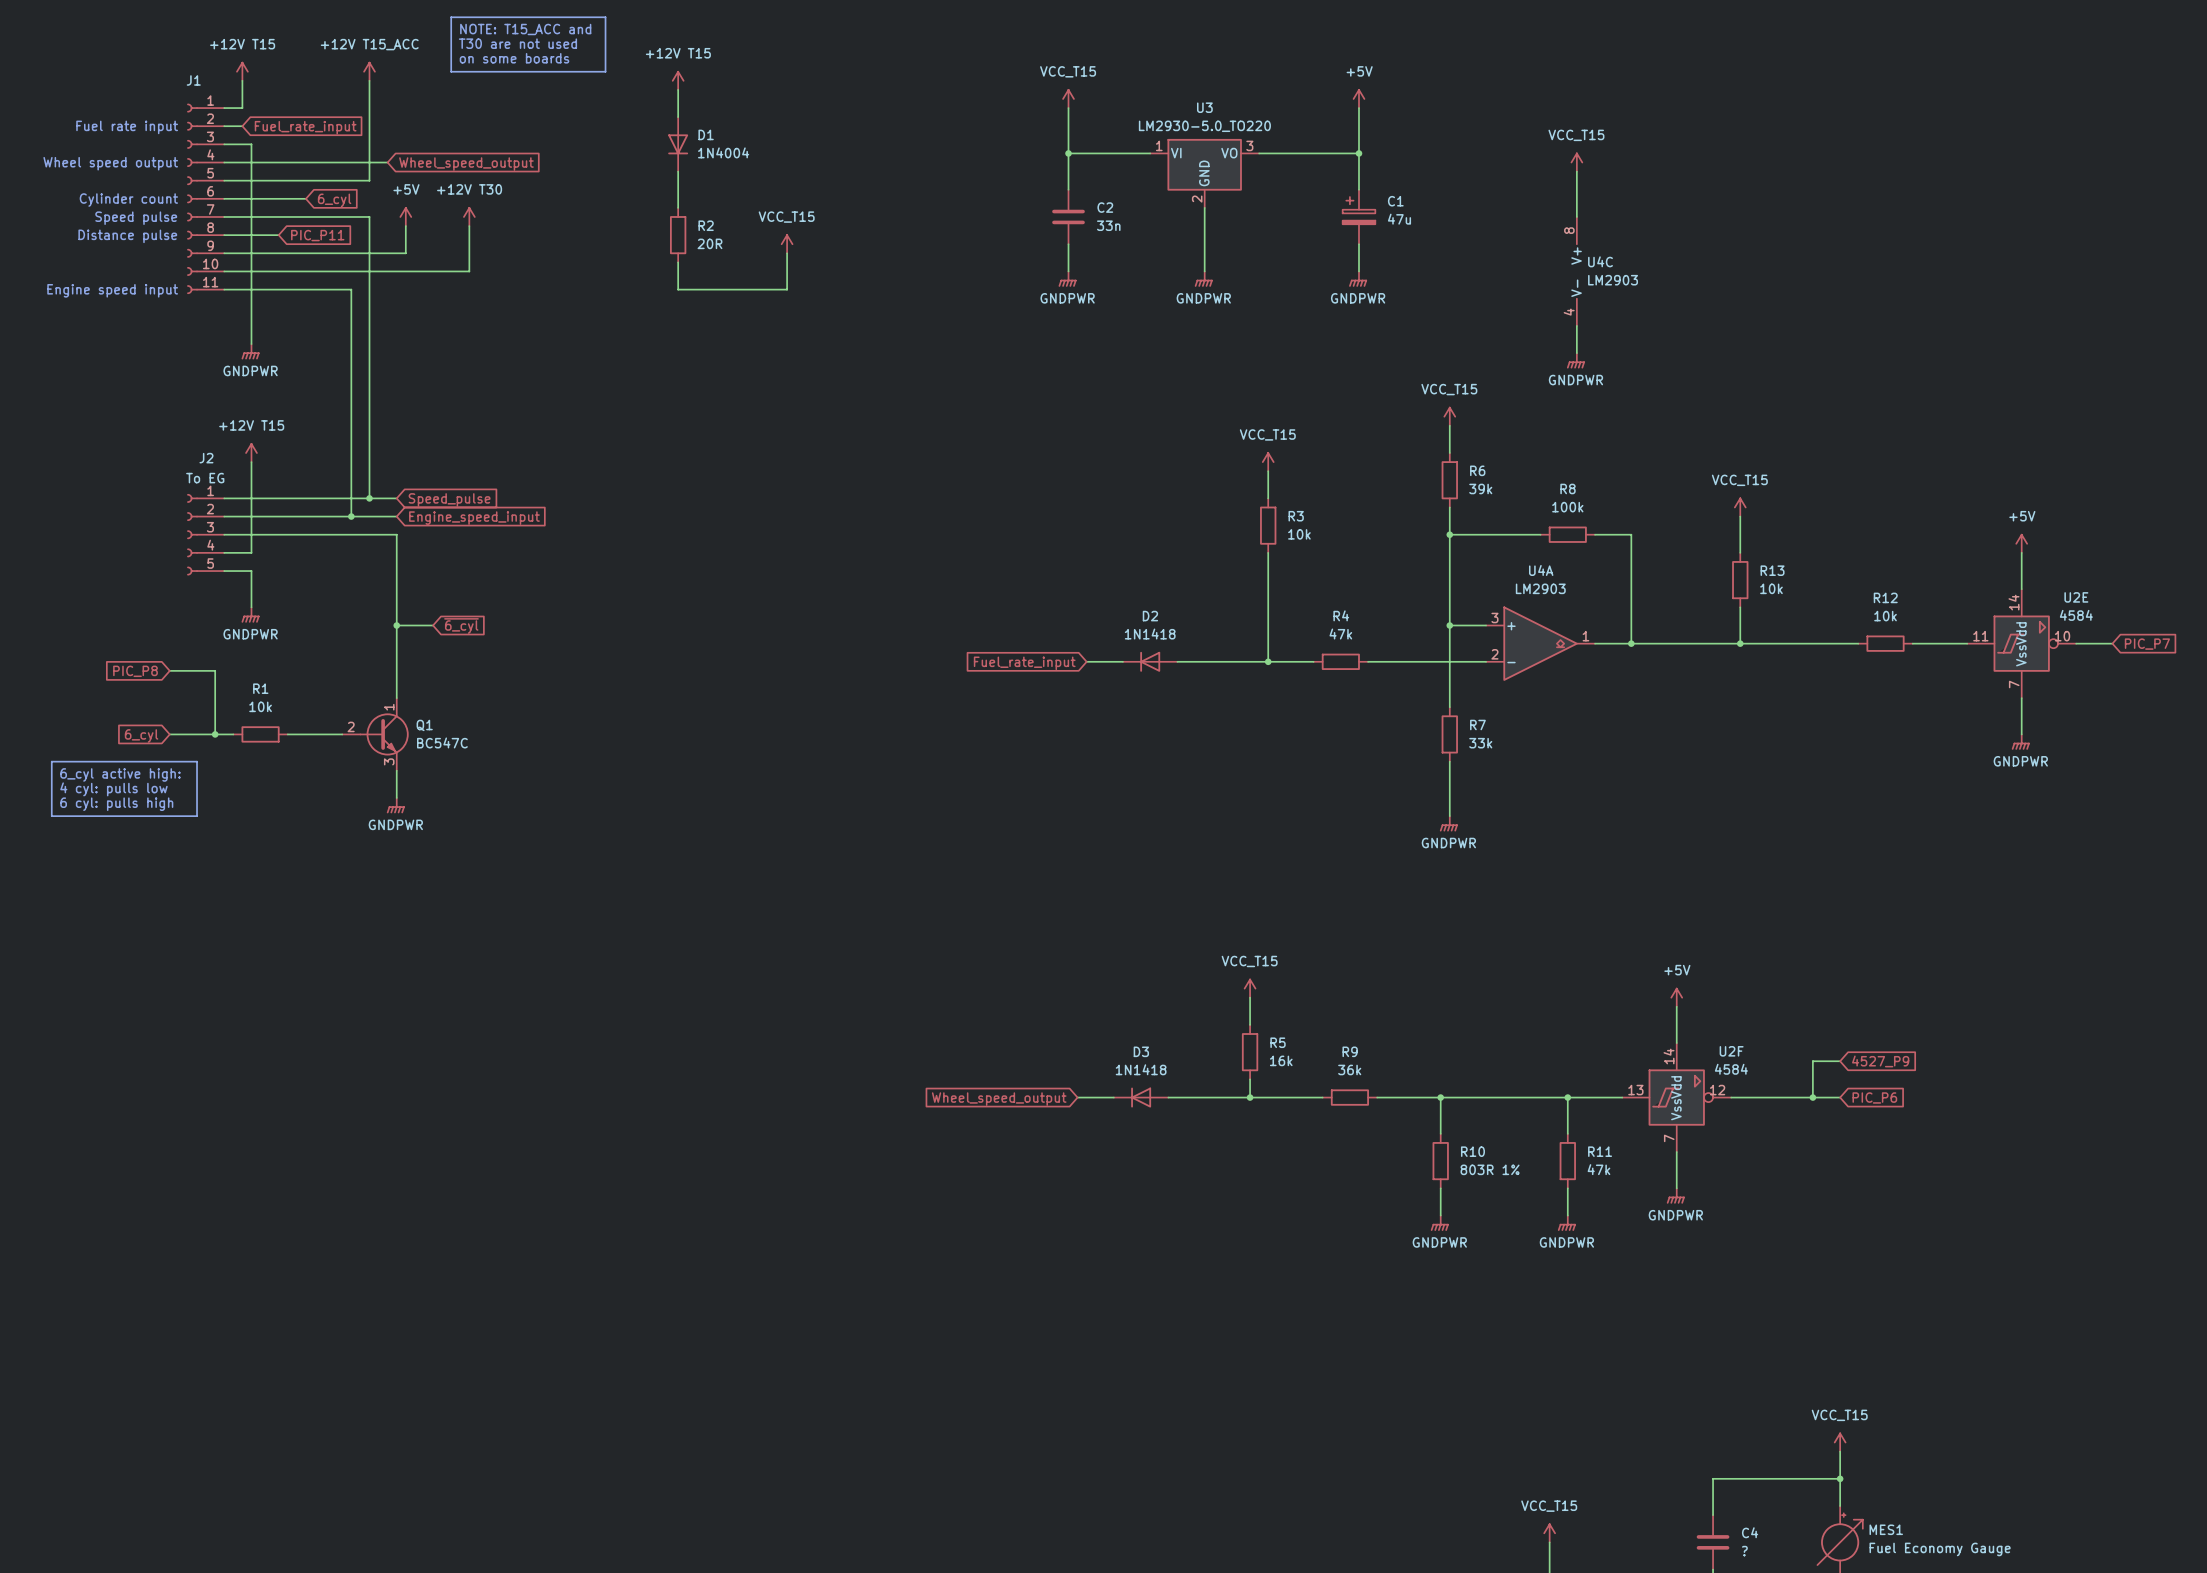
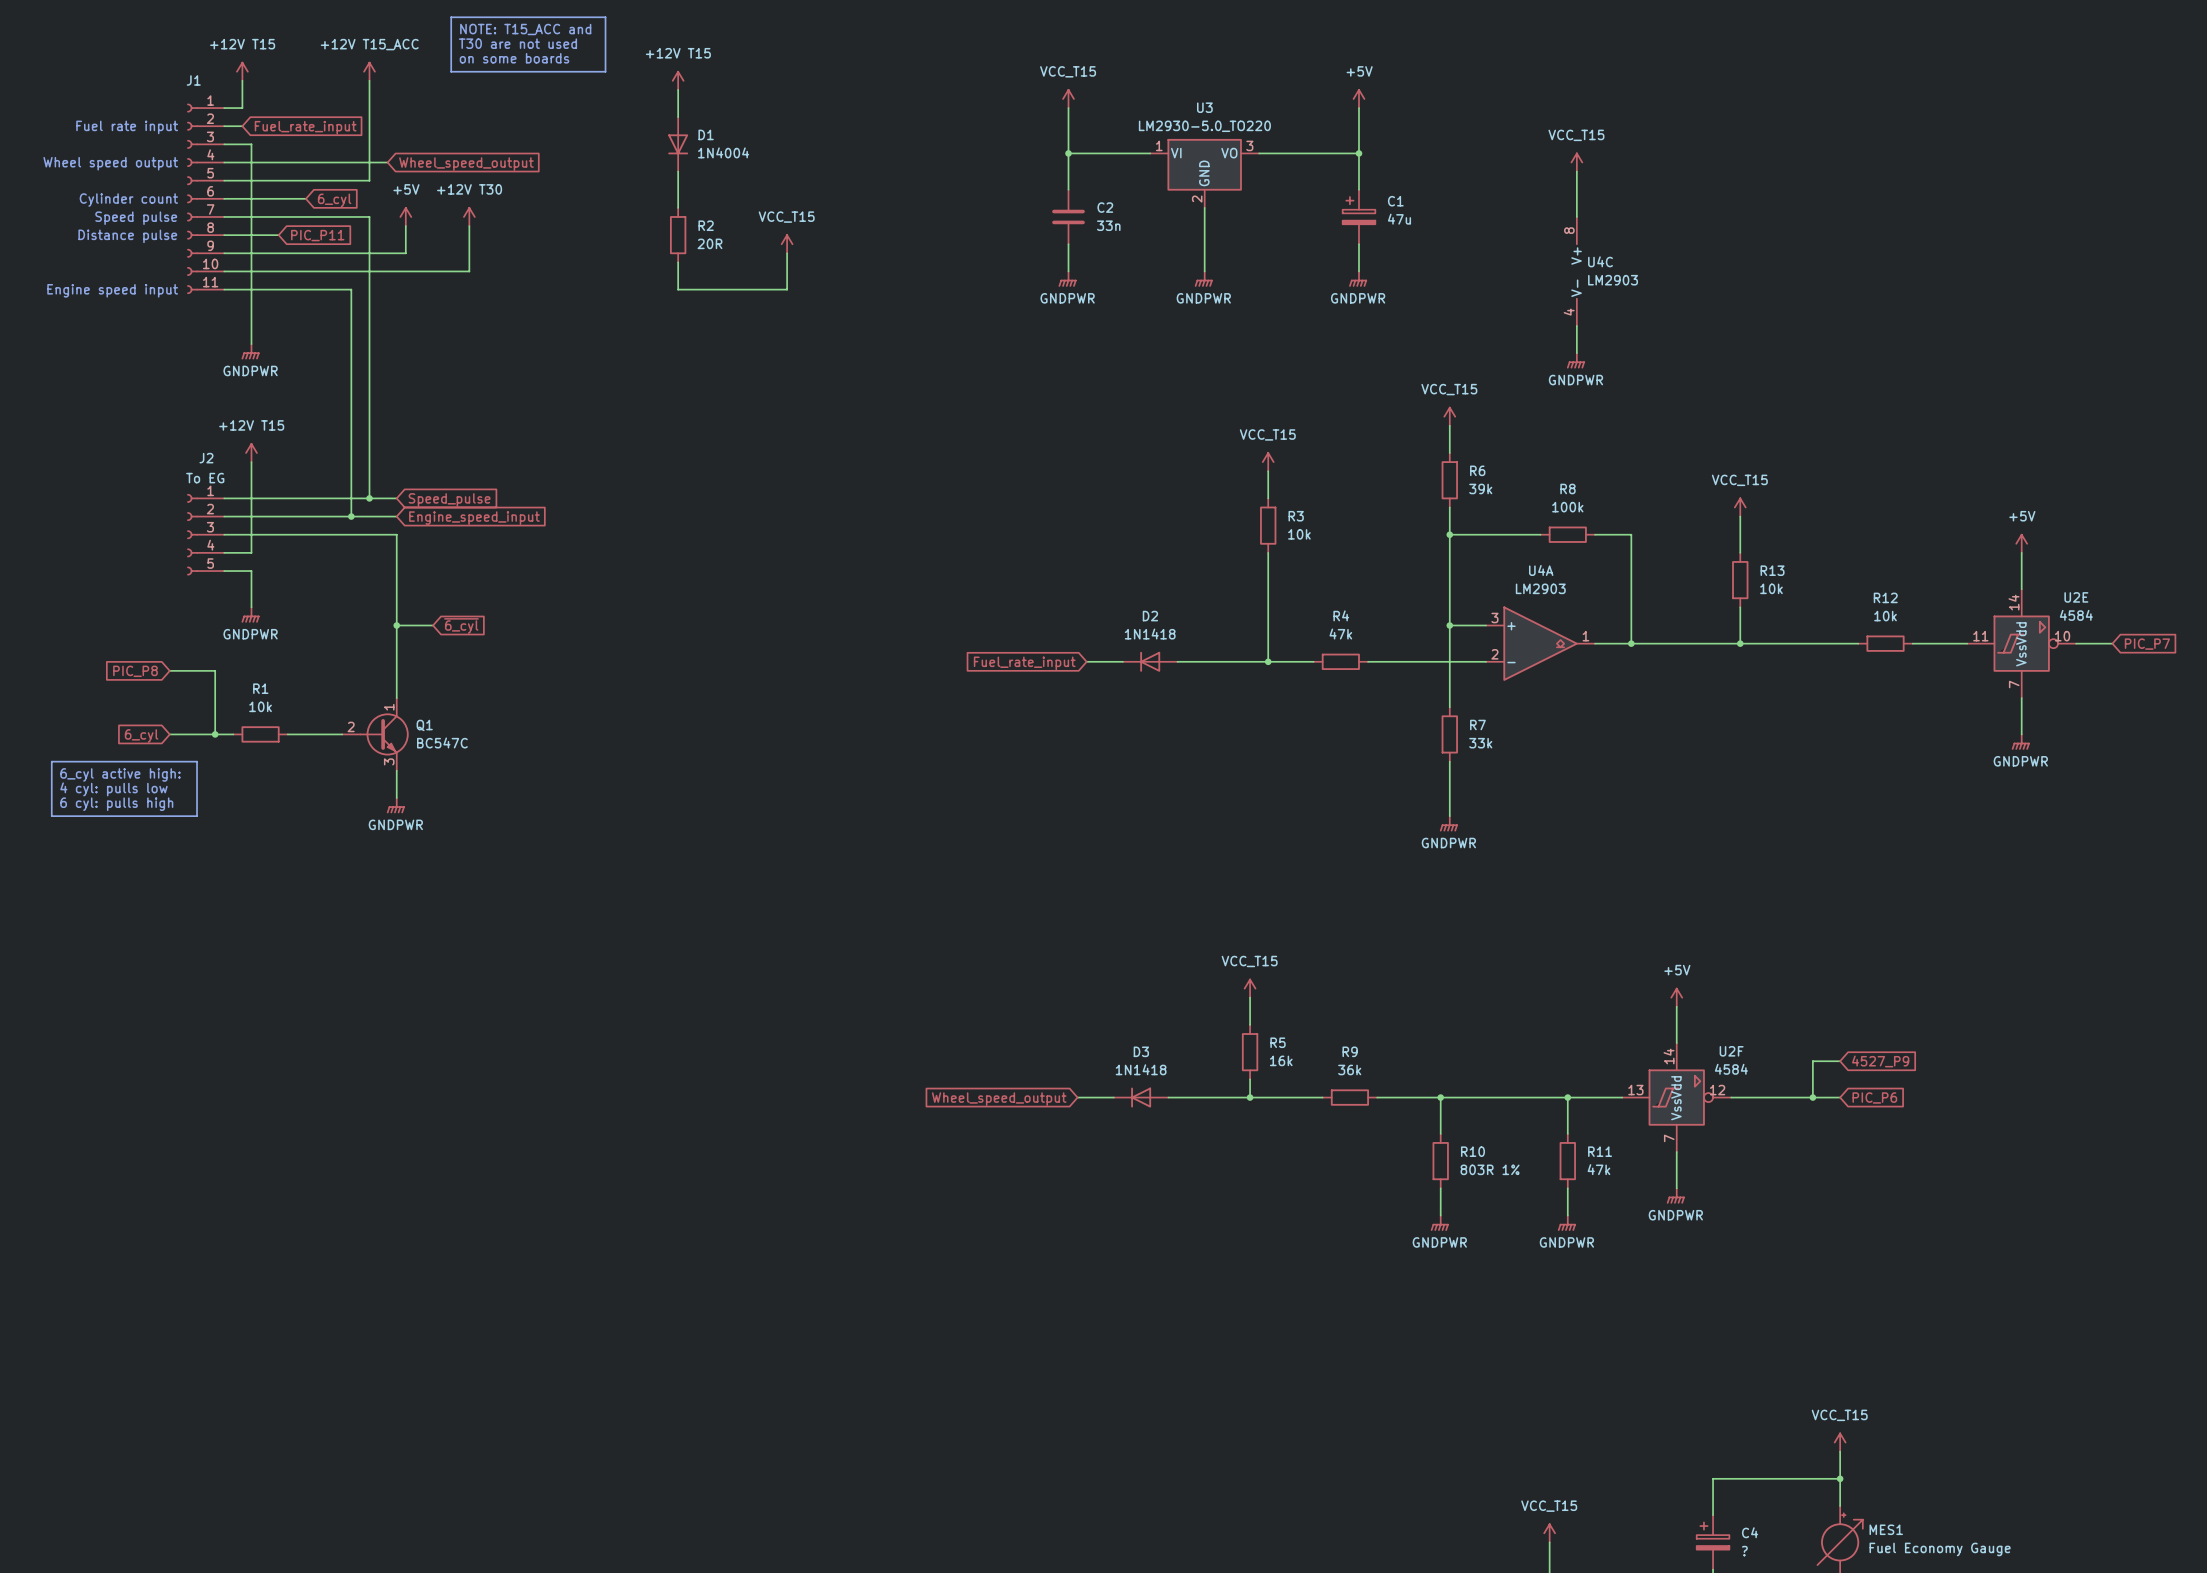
C4 symbol: [1696, 1515, 1730, 1570] -> [1696, 1515, 1730, 1570]

